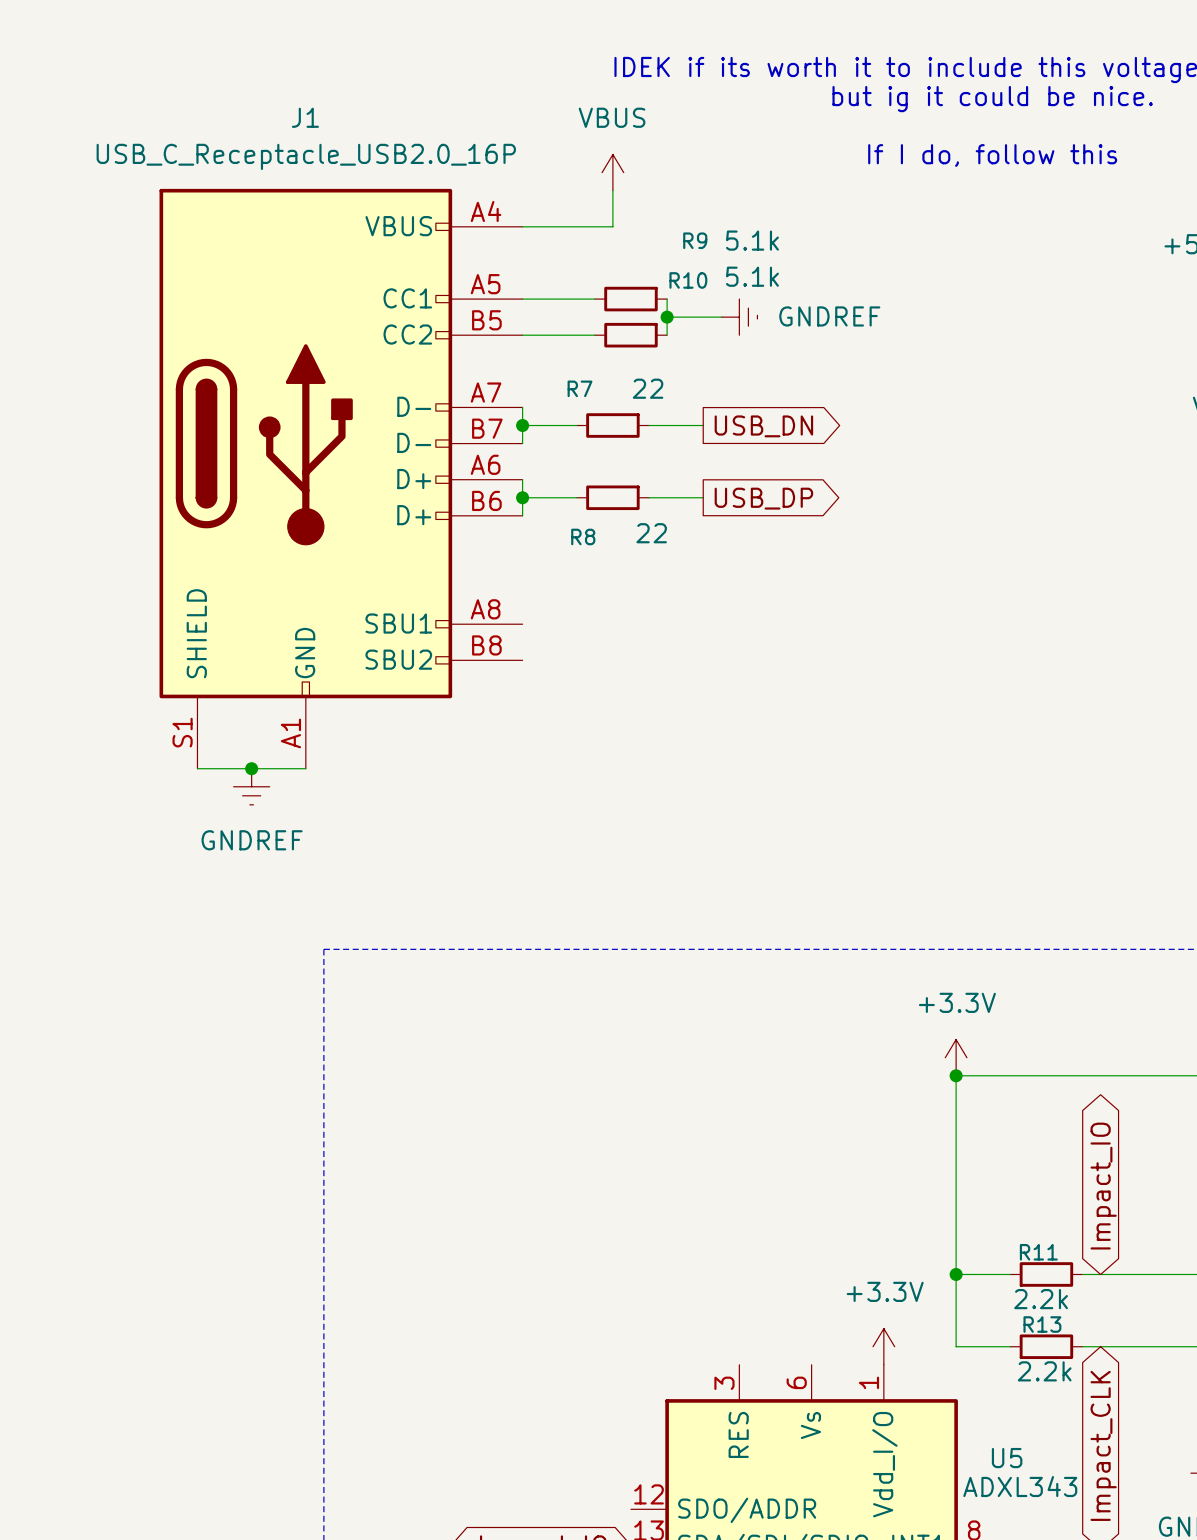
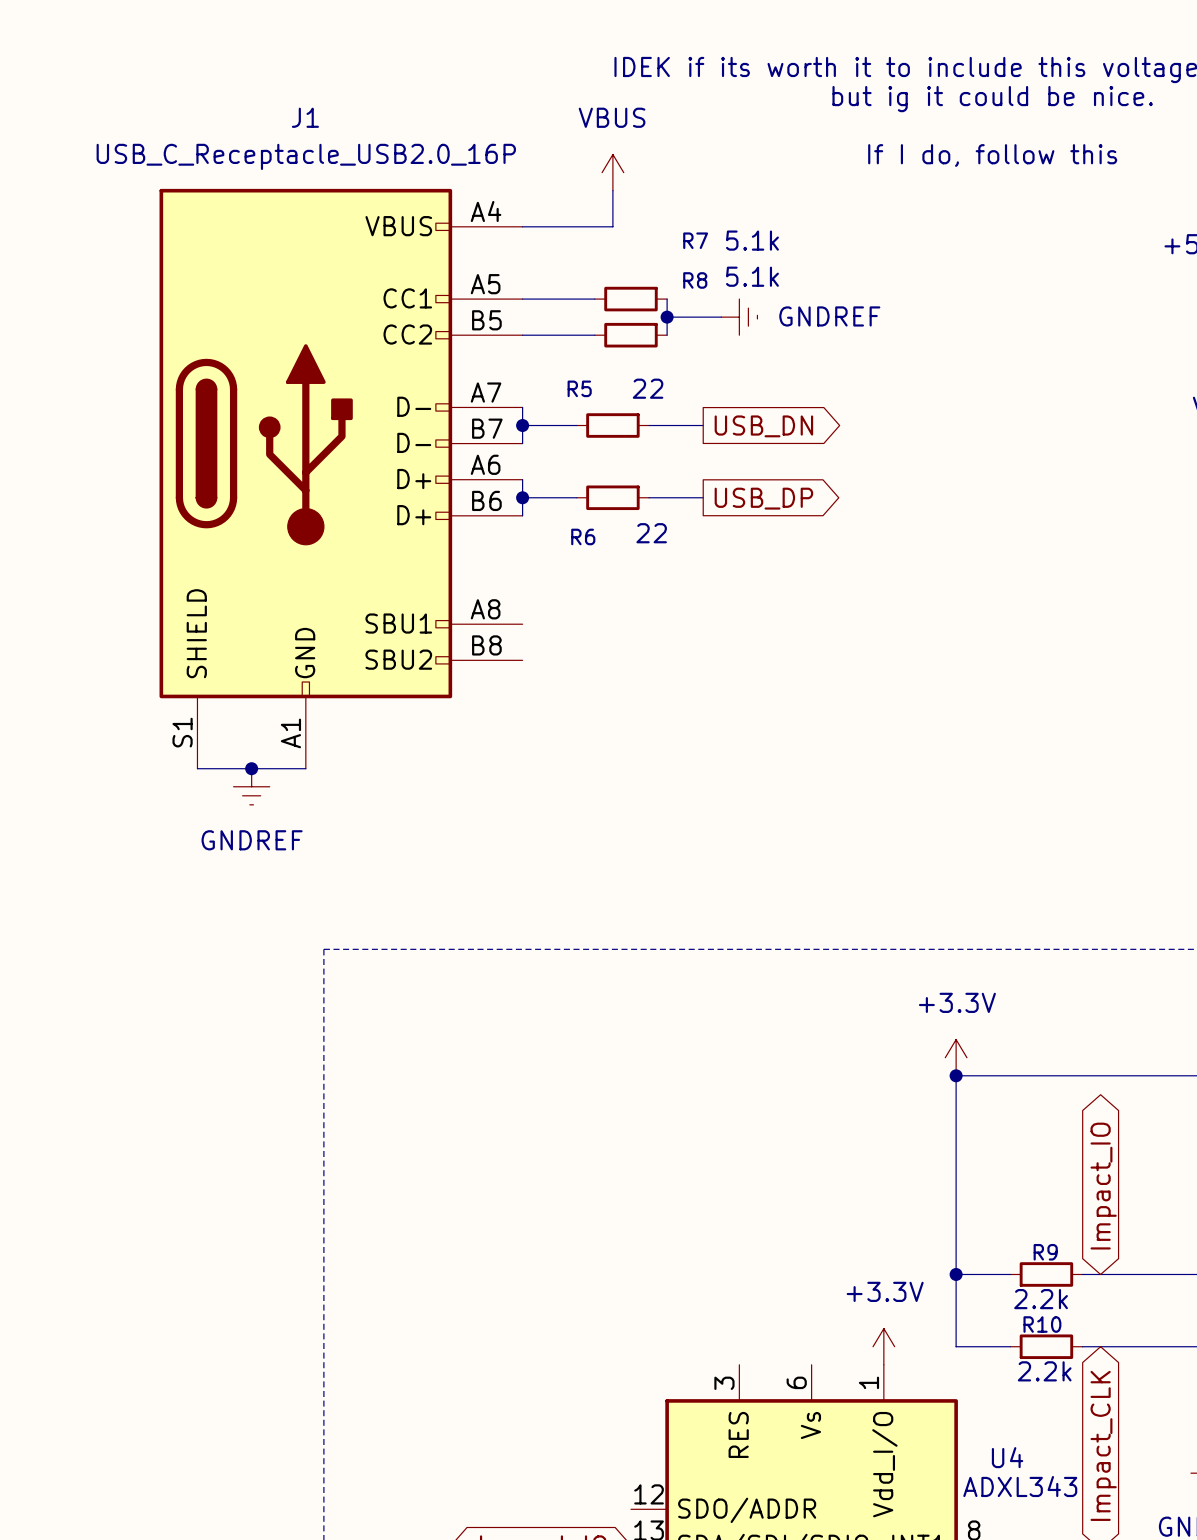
R9 name: R9 (695, 240) -> R7 (695, 240)
R10 name: R10 (688, 280) -> R8 (695, 280)
R7 name: R7 (580, 388) -> R5 (579, 388)
R8 name: R8 (583, 536) -> R6 (583, 536)
R11 name: R11 (1038, 1252) -> R9 (1045, 1252)
R13 name: R13 (1042, 1324) -> R10 (1042, 1324)
U5 name: U5 (1007, 1458) -> U4 (1007, 1457)

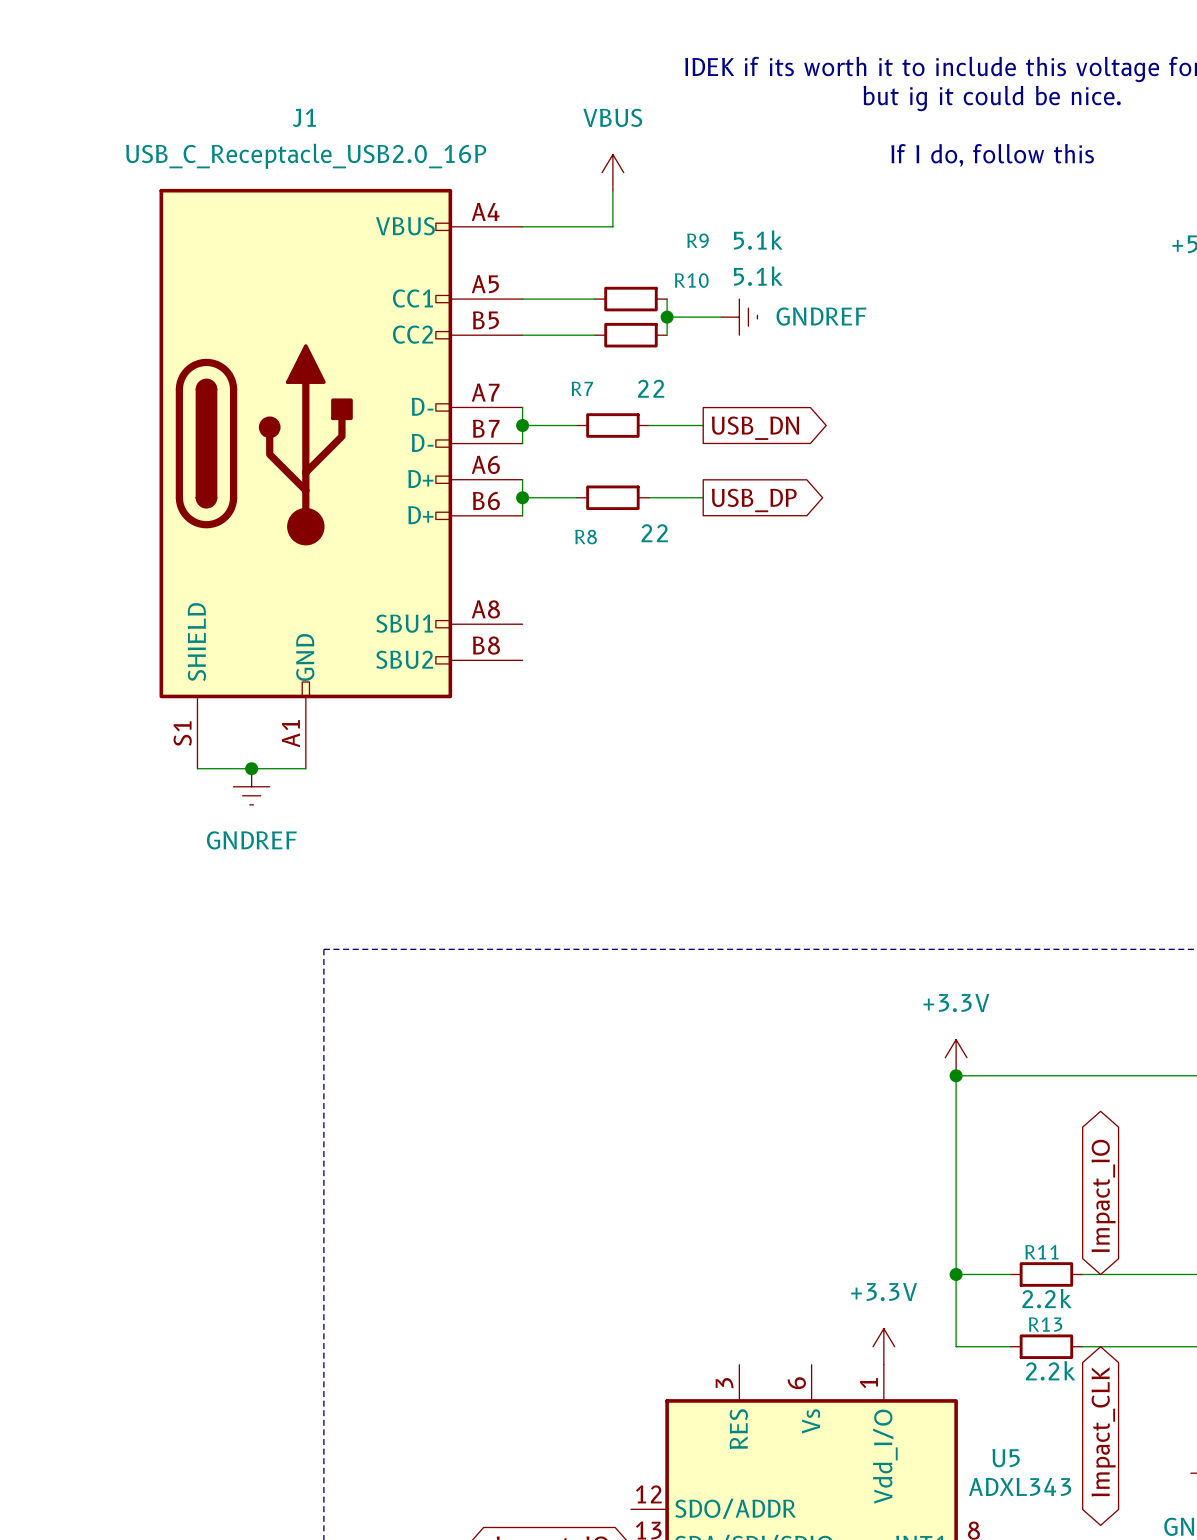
R7 name: R7 (695, 240) -> R9 (697, 240)
R8 name: R8 (695, 280) -> R10 (691, 280)
R5 name: R5 (579, 388) -> R7 (582, 388)
R6 name: R6 (583, 536) -> R8 (586, 537)
R9 name: R9 (1045, 1252) -> R11 (1041, 1252)
R10 name: R10 (1042, 1324) -> R13 (1045, 1324)
U4 name: U4 (1007, 1457) -> U5 (1006, 1458)

